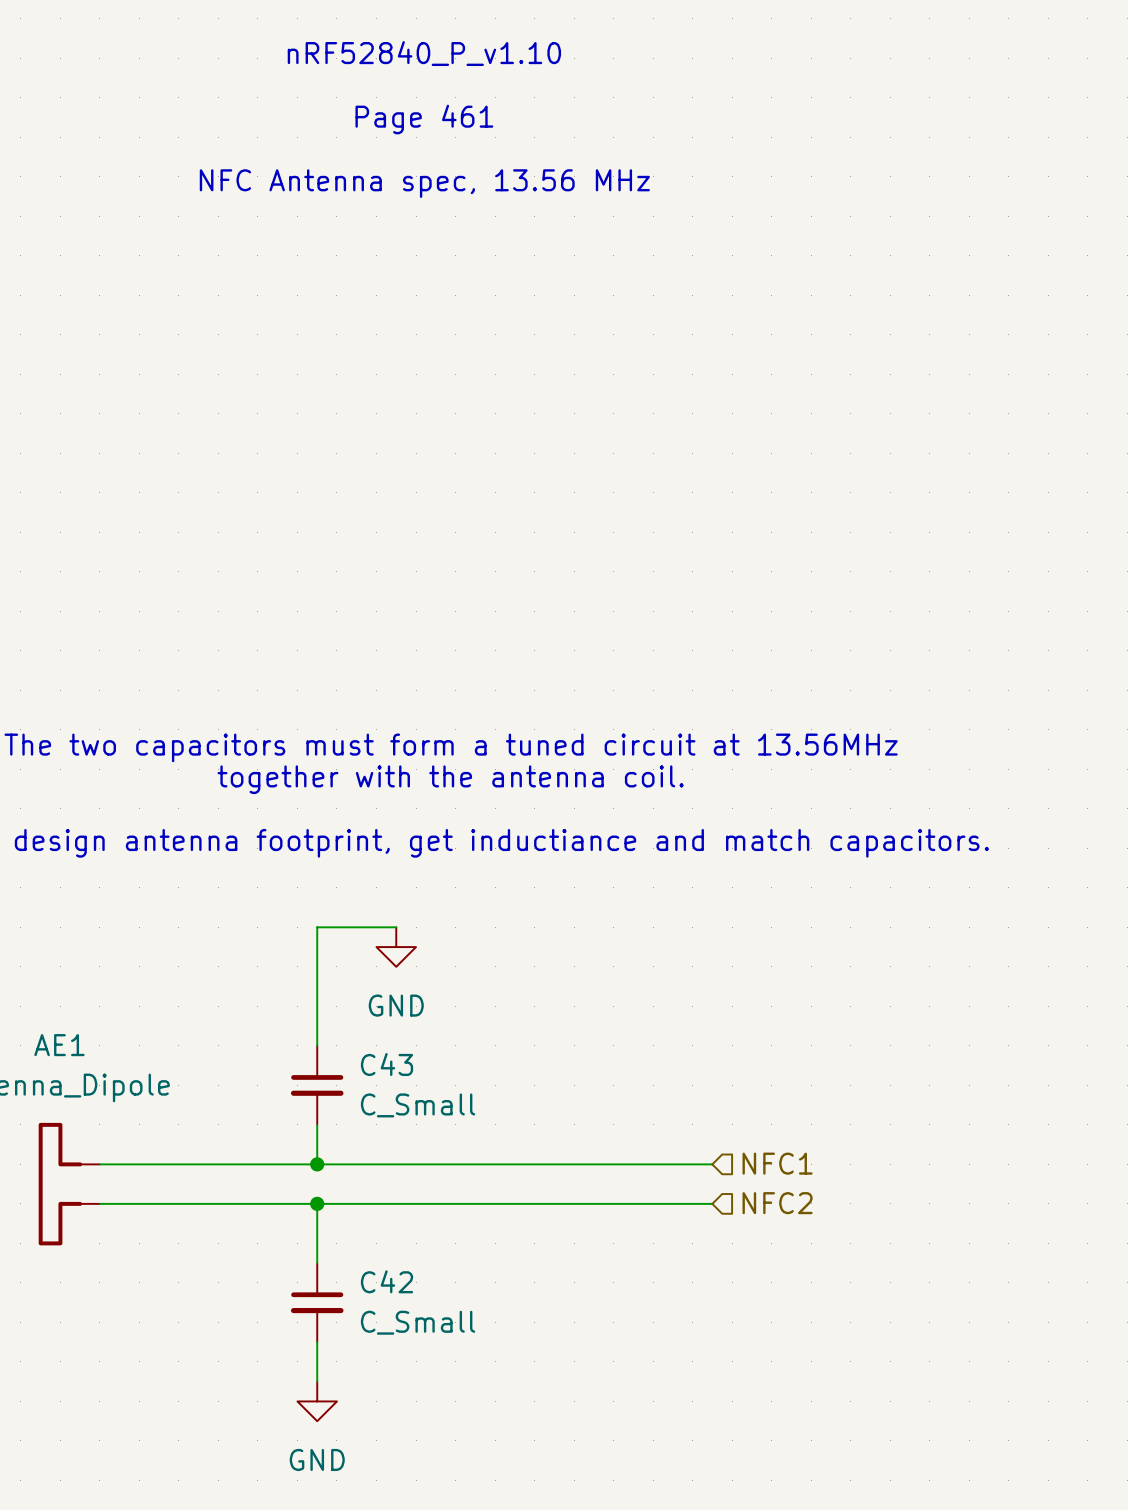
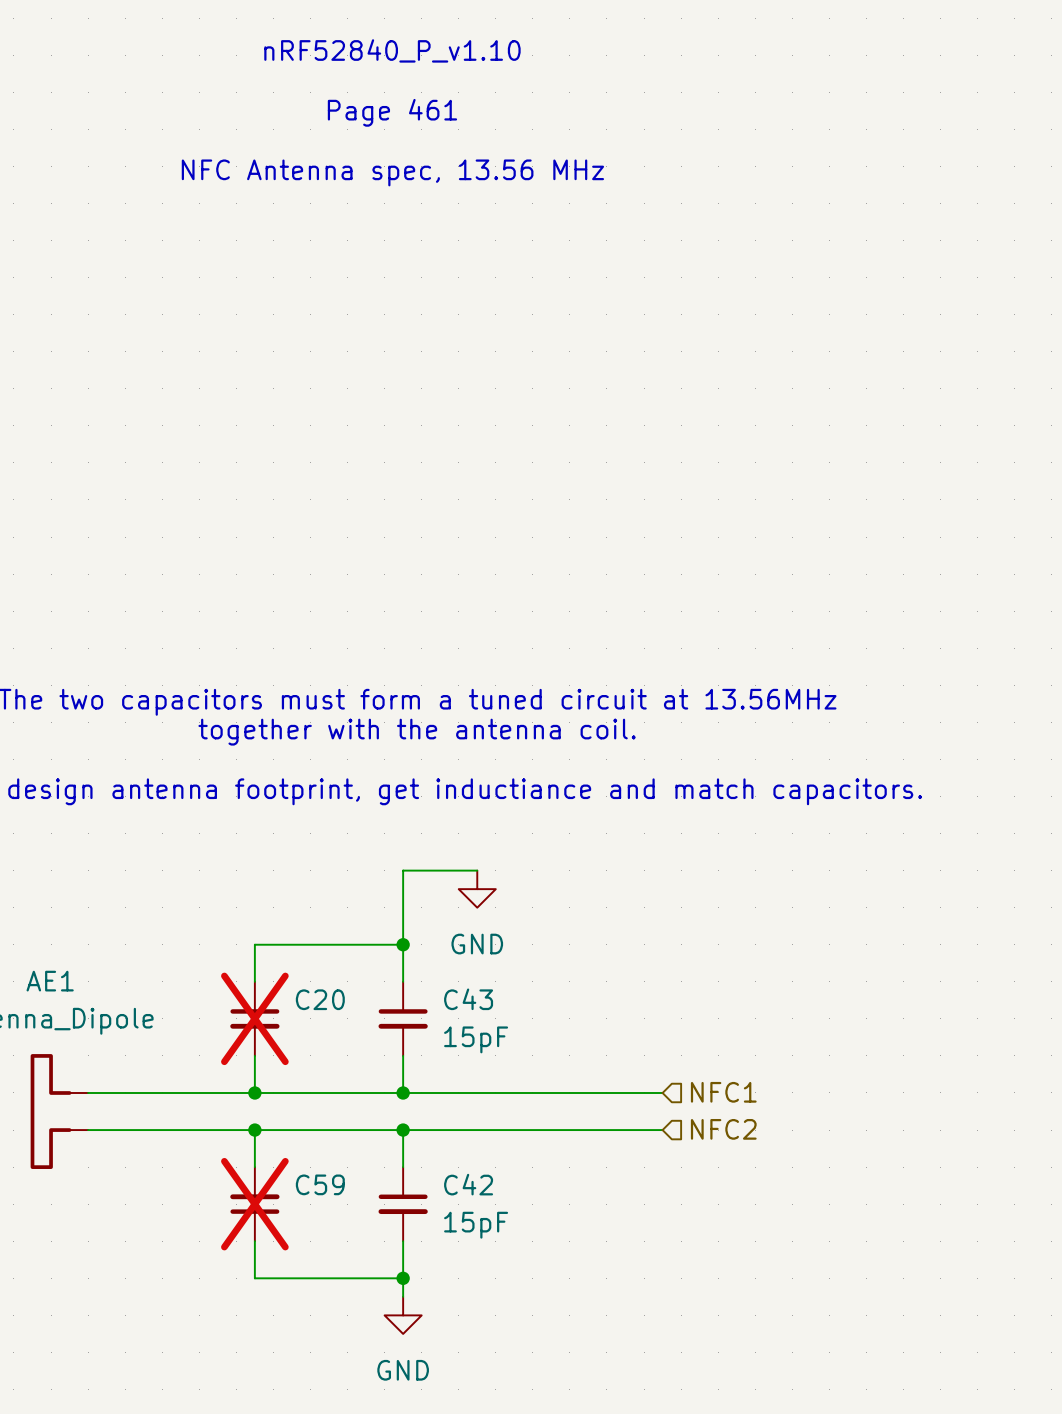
wire: (396, 927) (317, 927) (317, 1045) -> (477, 870) (403, 870) (403, 981)
power symbol position: GND (396, 947) -> GND (477, 889)
wire: none -> (403, 944) (254, 944) (254, 981)
junction: none -> (403, 944)
C20: none -> (254, 1018)
C43 position: (317, 1085) -> (403, 1018)
C43 value: C_Small (418, 1105) -> 15pF (476, 1039)
wire: none -> (254, 1055) (254, 1092)
wire: (317, 1124) (317, 1164) -> (403, 1055) (403, 1092)
junction: none -> (254, 1092)
junction: (317, 1164) -> none
junction: none -> (403, 1092)
junction: none -> (254, 1130)
wire: (317, 1203) (317, 1263) -> (403, 1241) (403, 1296)
junction: (317, 1203) -> none
wire: none -> (403, 1130) (403, 1167)
junction: none -> (403, 1130)
C59: none -> (254, 1204)
C42 position: (317, 1302) -> (403, 1204)
wire: none -> (254, 1241) (254, 1278) (403, 1278)
C42 value: C_Small (418, 1322) -> 15pF (476, 1225)
wire: (317, 1342) (317, 1381) -> (254, 1130) (254, 1167)
junction: none -> (403, 1278)
power symbol position: GND (317, 1401) -> GND (403, 1315)

